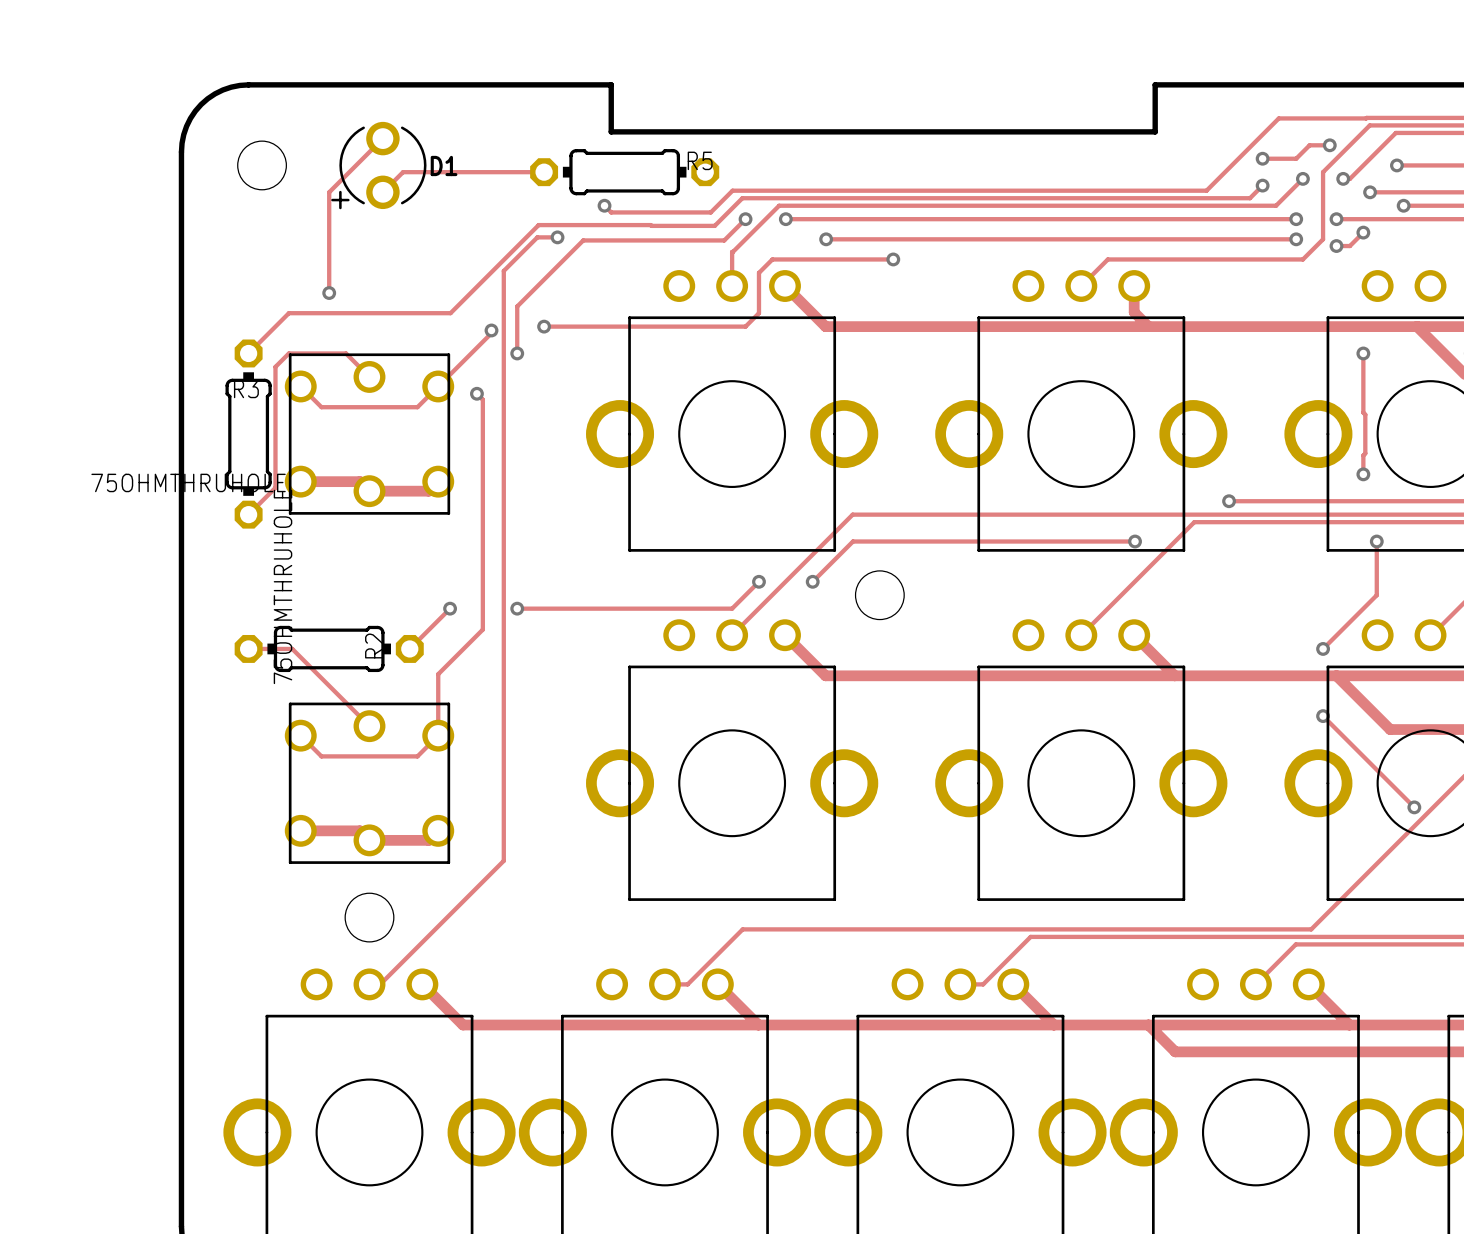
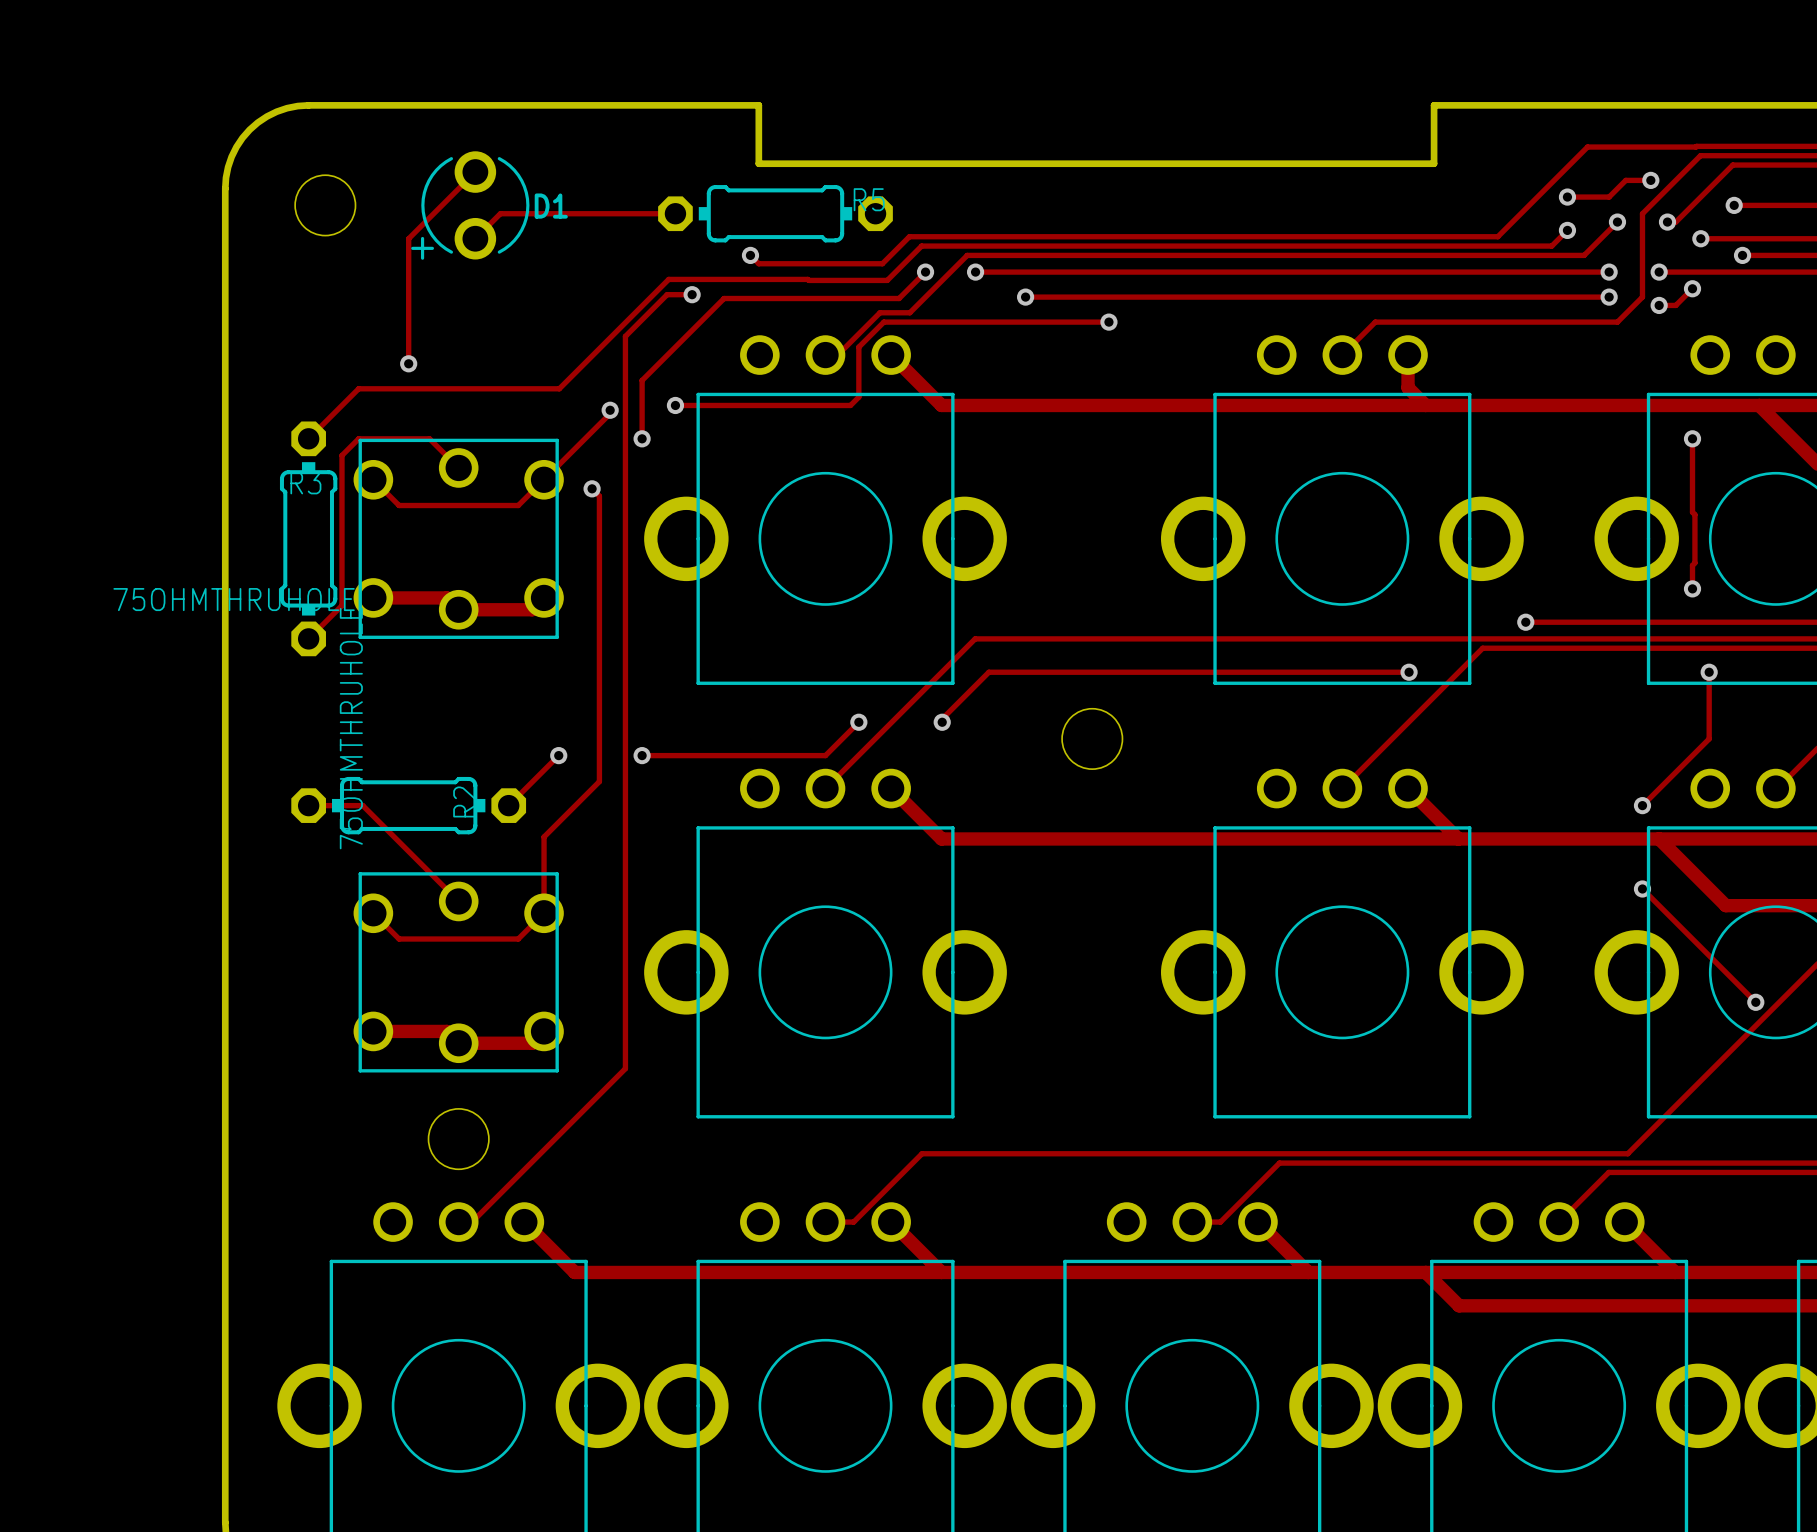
track: (732, 251) (732, 286) -> (908, 312) (880, 312) (837, 355) (825, 355)
track: (772, 259) (758, 272) (758, 313) (745, 326) (685, 326) -> (958, 322) (883, 322) (858, 347) (858, 397) (850, 405)
track: (785, 286) (825, 326) -> (891, 355) (941, 405) (1024, 405)
part position: (732, 410) -> (825, 510)
track: (852, 514) (732, 635) -> (1058, 638) (975, 638) (825, 788)
track: (853, 541) (812, 581) -> (1058, 672) (988, 672) (942, 718) (942, 722)
track: (758, 581) (732, 608) (664, 608) -> (858, 722) (825, 755)
via position: (812, 581) -> (858, 722)
track: (785, 635) (825, 675) -> (891, 788) (941, 838) (1024, 838)
part position: (732, 760) -> (825, 943)

